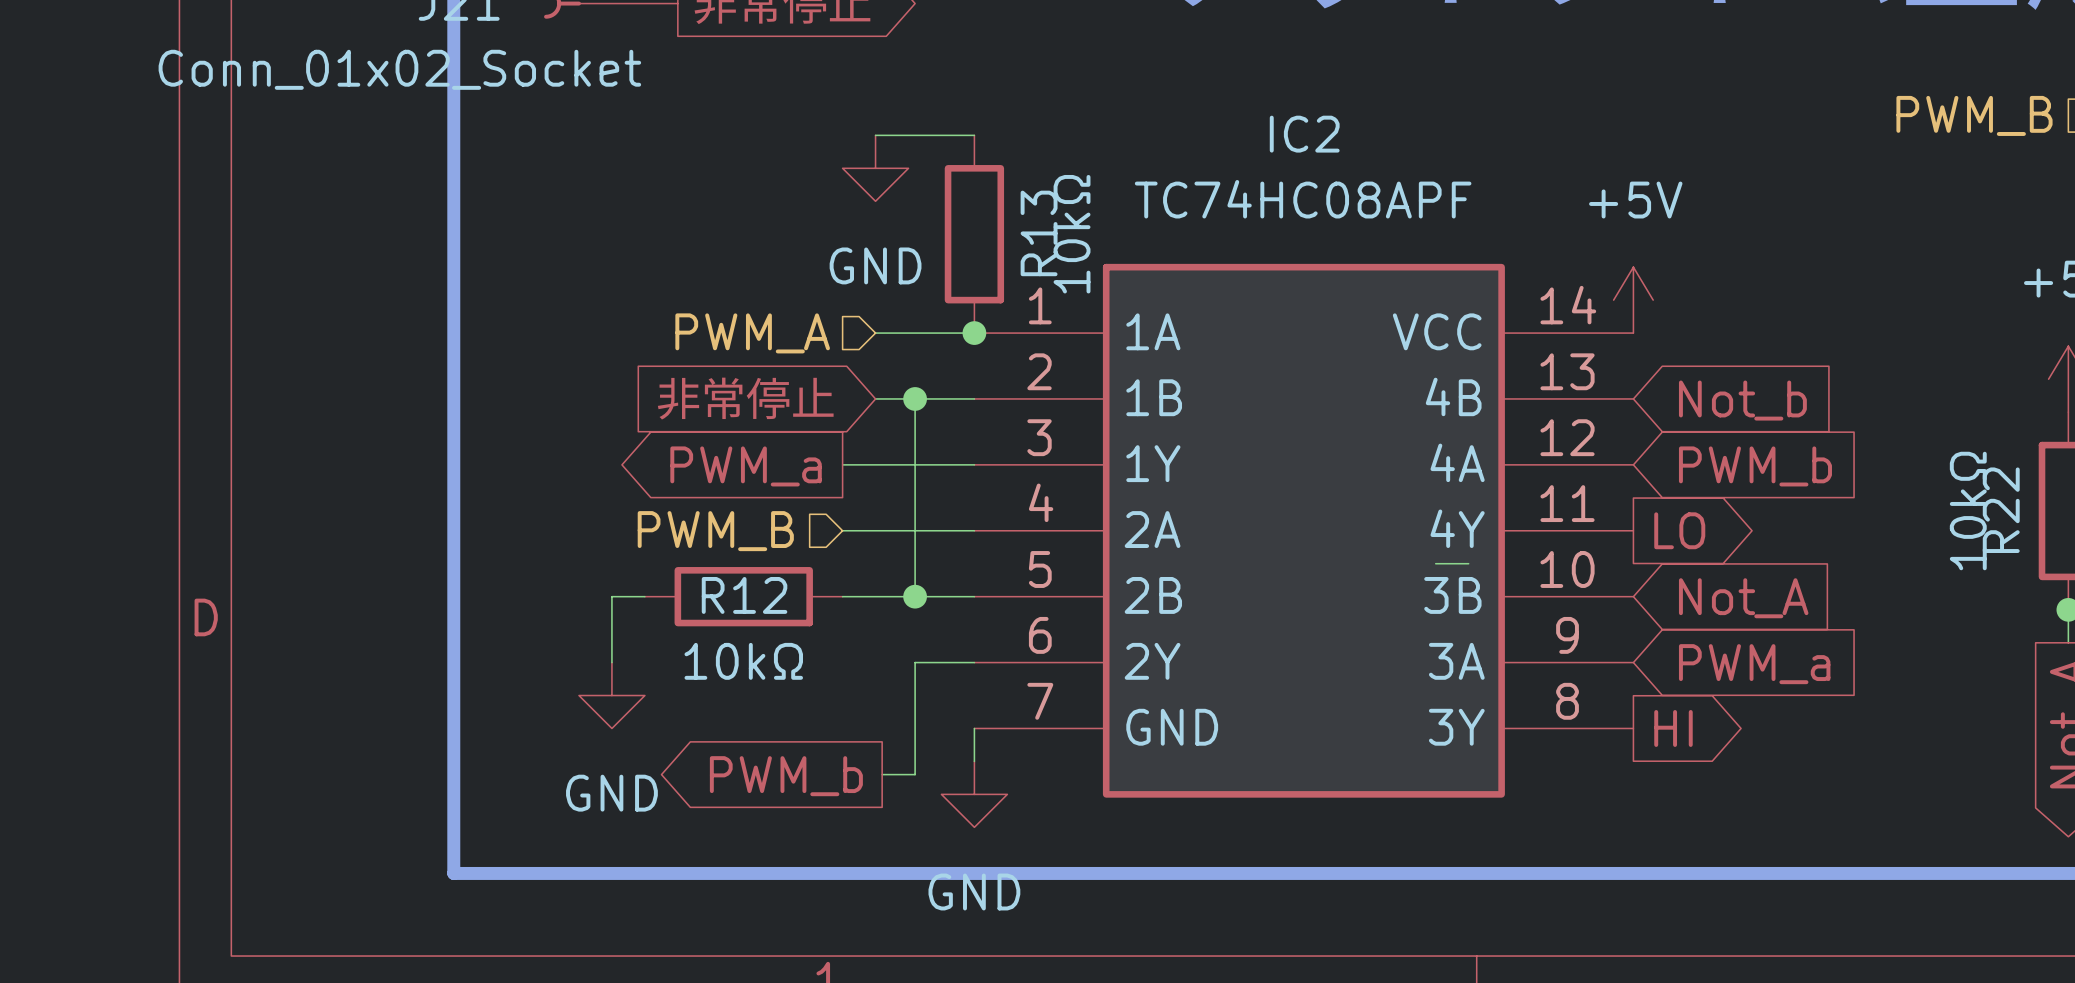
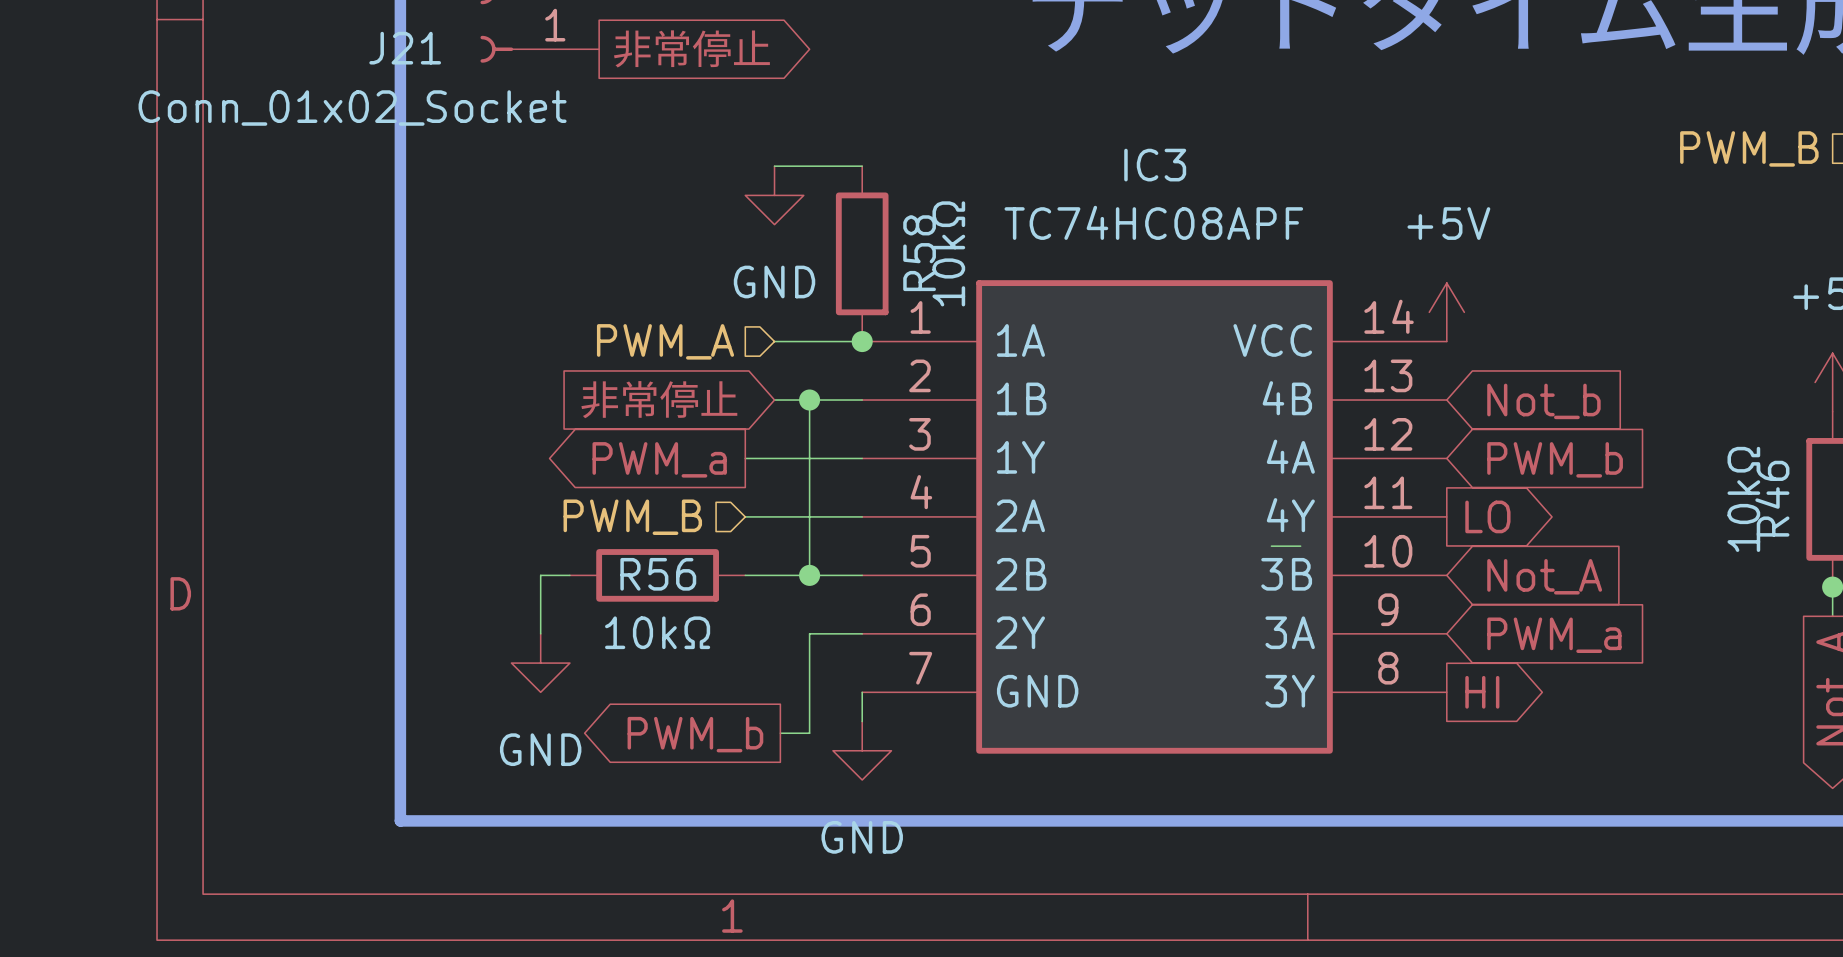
IC2 name: IC2 (1304, 134) -> IC3 (1155, 165)
R13 name: R13 (1039, 233) -> R58 (919, 253)
R22 name: R22 (2001, 510) -> R46 (1772, 498)
R12 name: R12 (744, 595) -> R56 (658, 574)

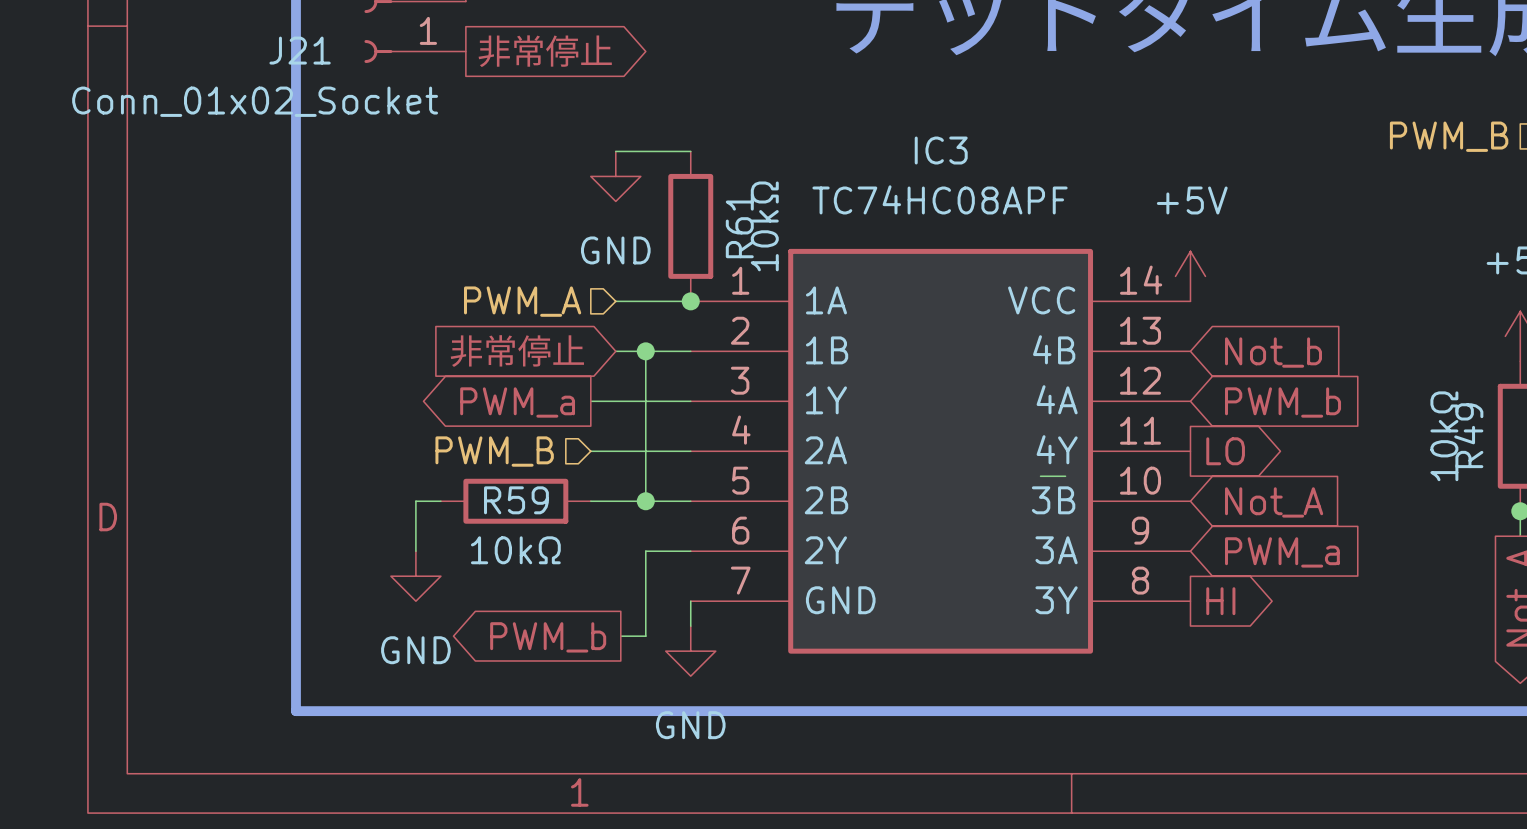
R58 name: R58 (919, 253) -> R61 (739, 225)
R46 name: R46 (1772, 498) -> R49 (1468, 435)
R56 name: R56 (658, 574) -> R59 (516, 500)

